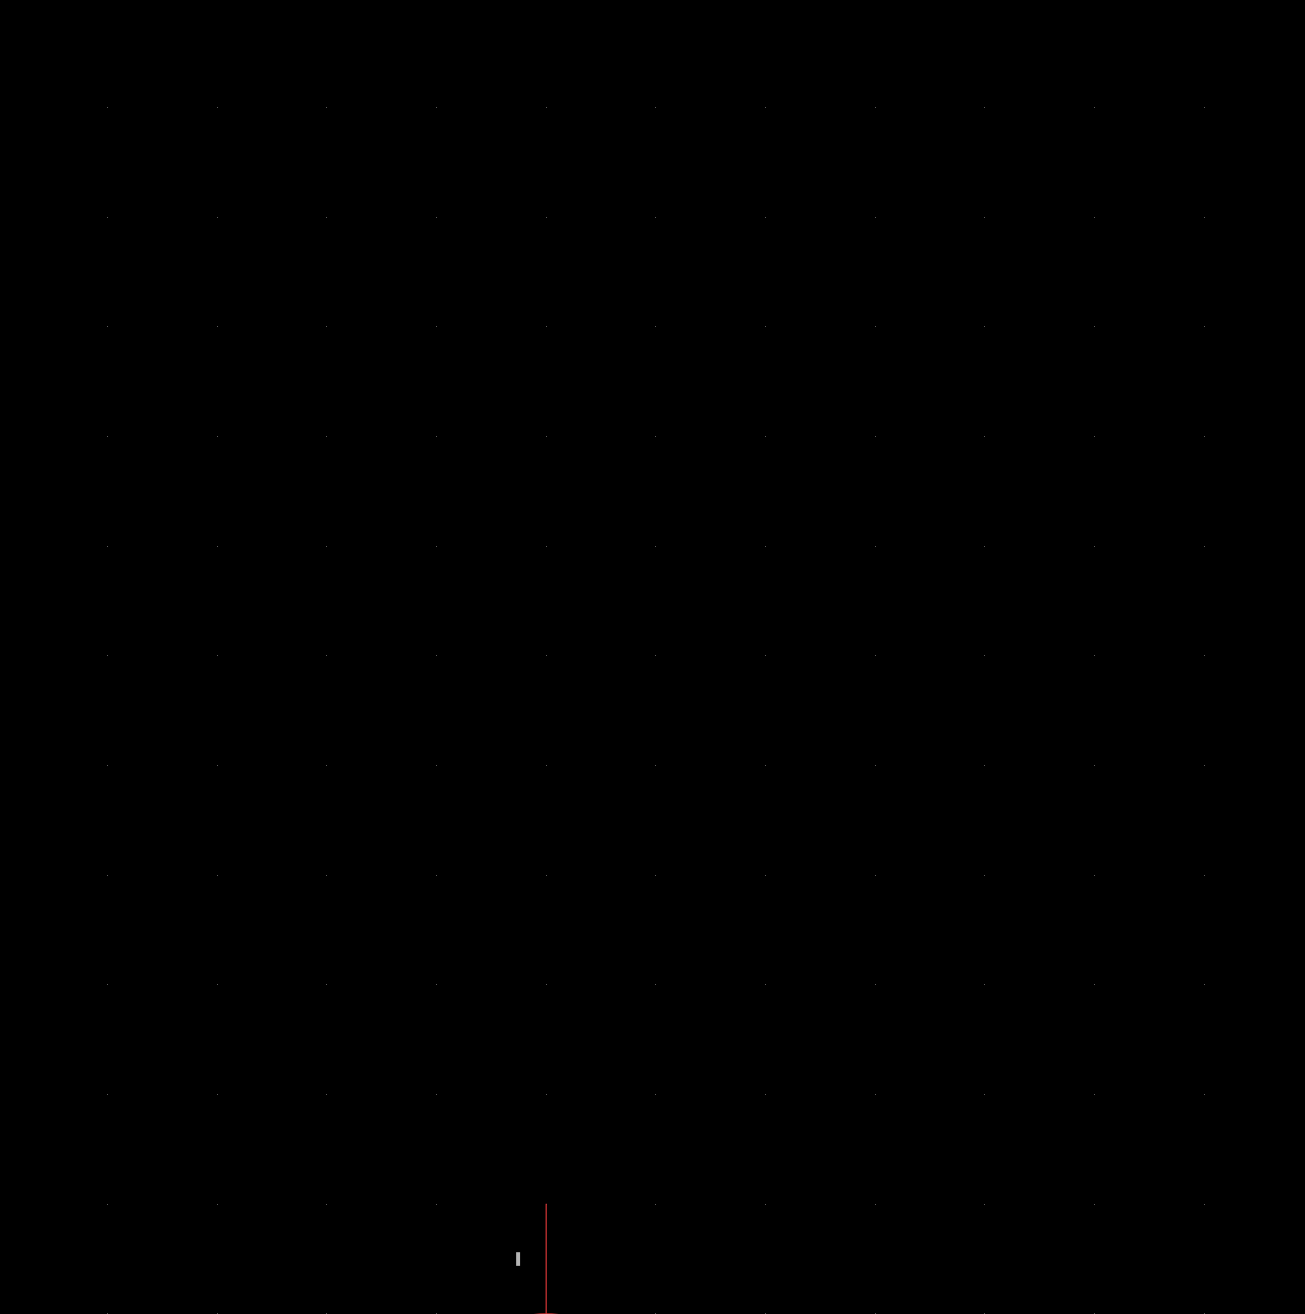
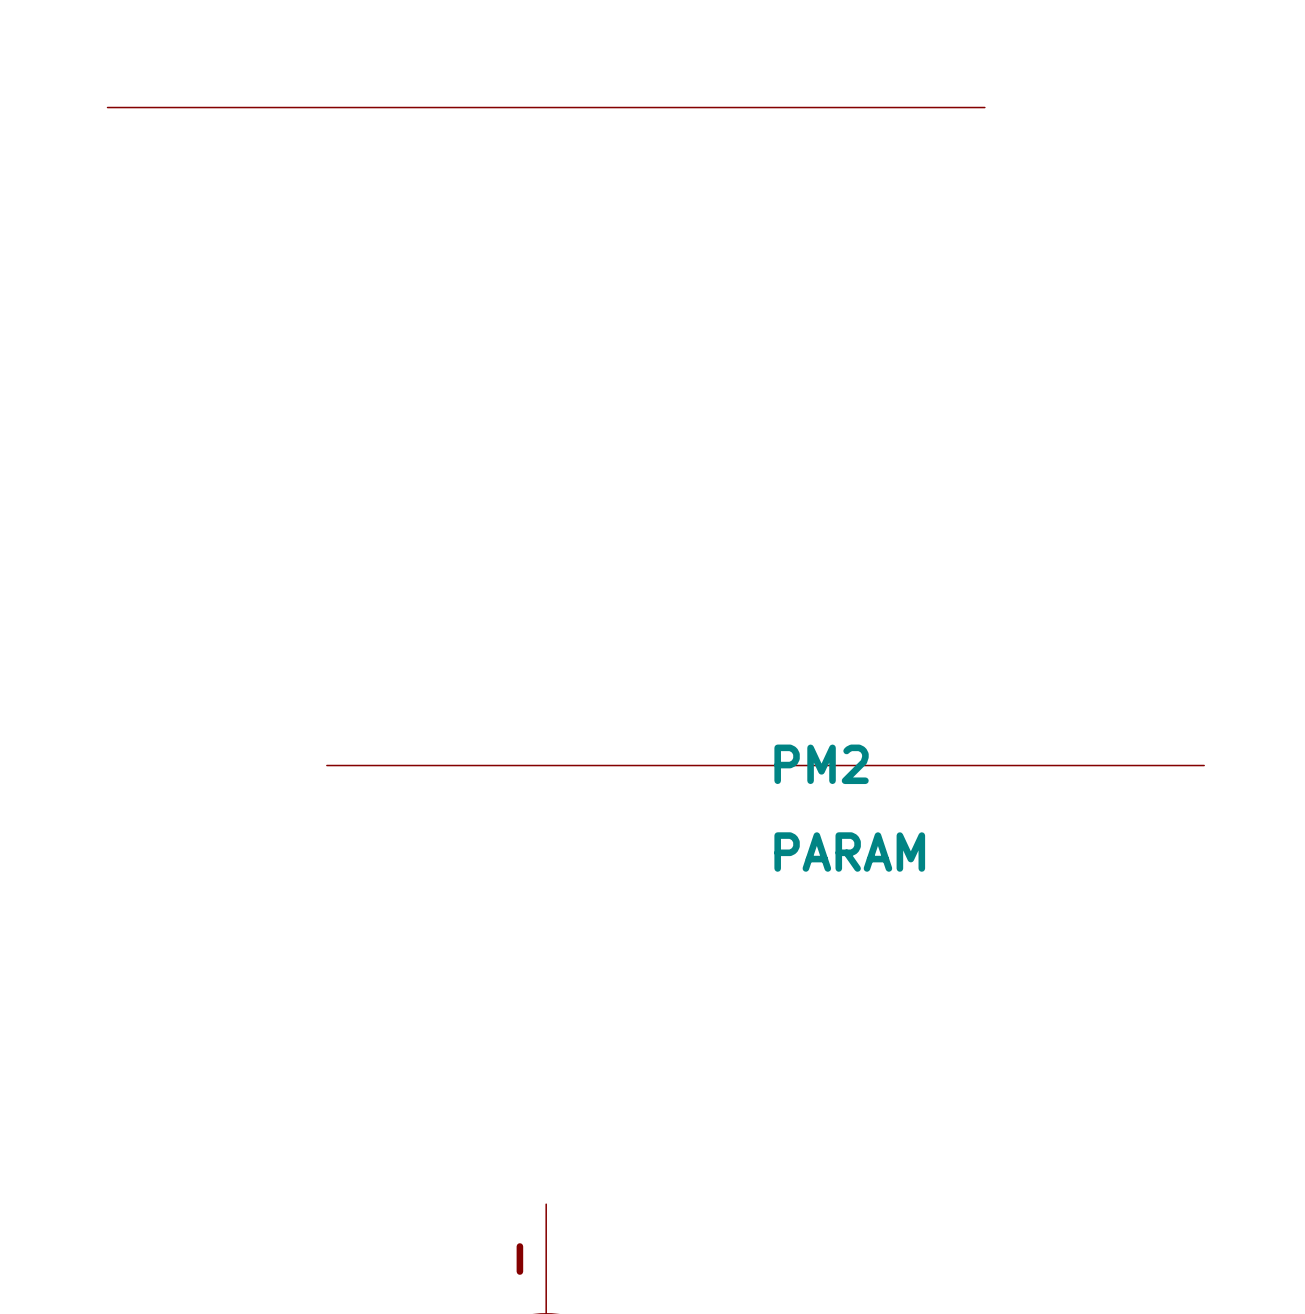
part: none -> (546, 107)
PM2: none -> PARAM (765, 765)

